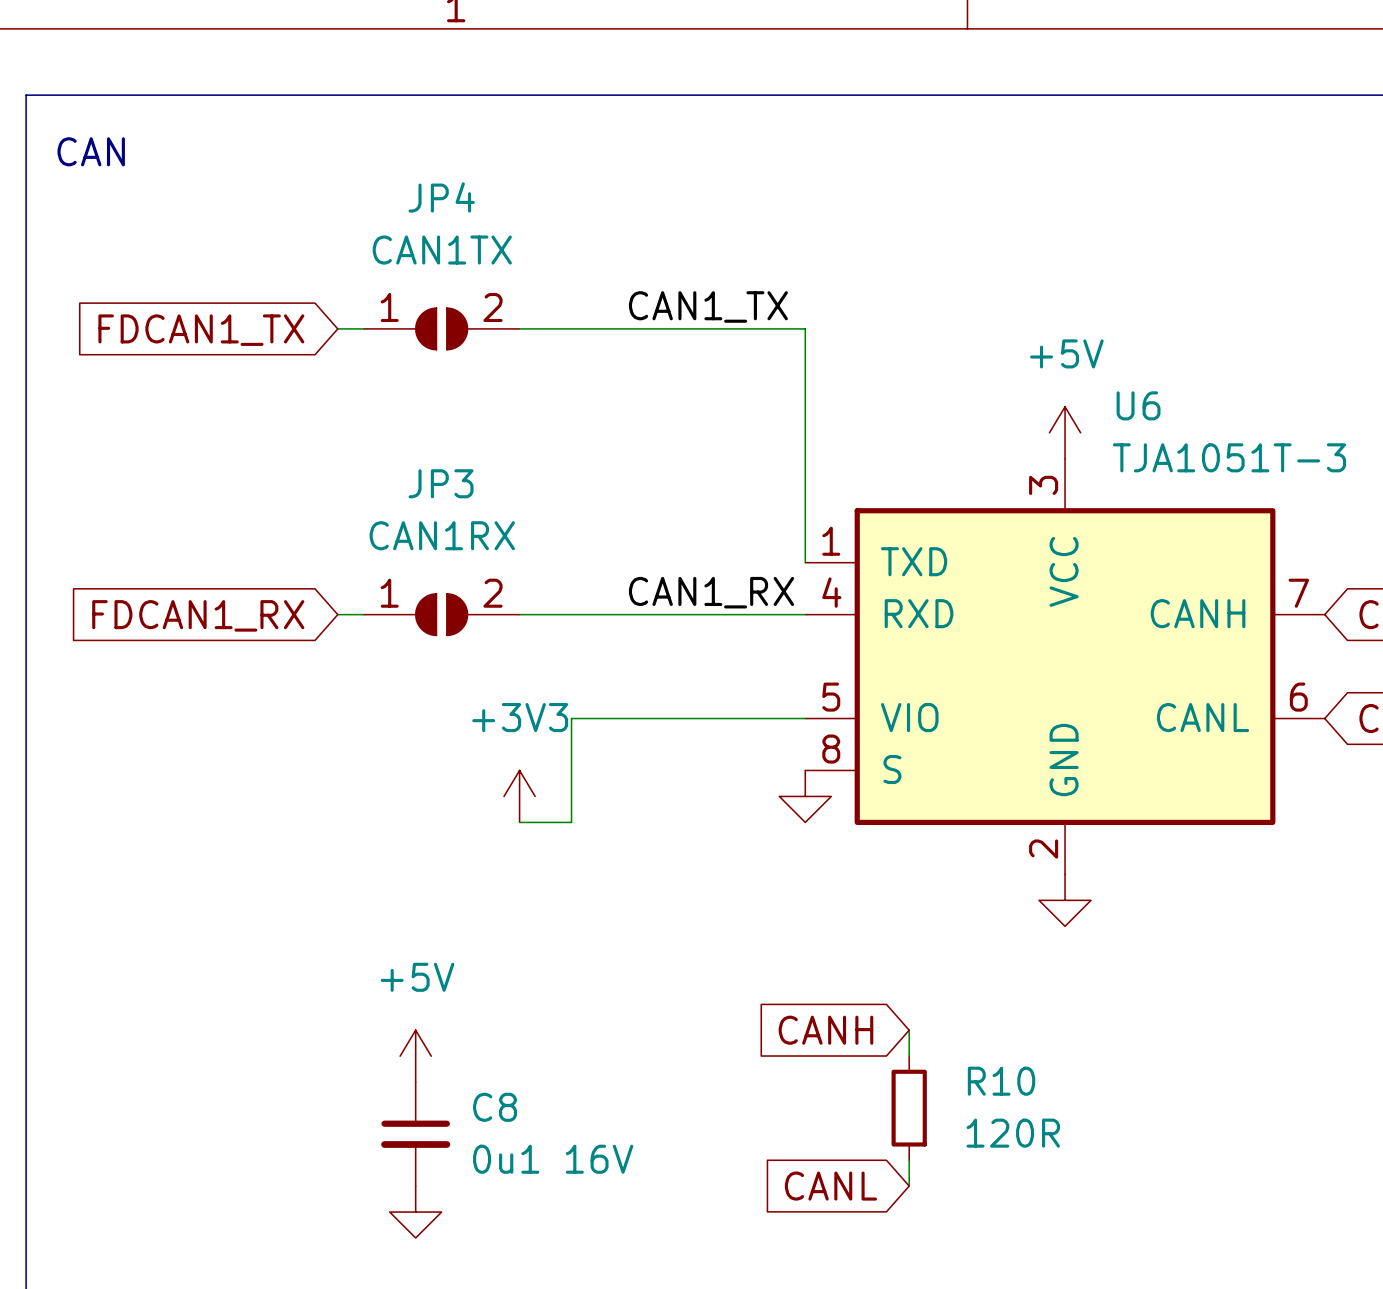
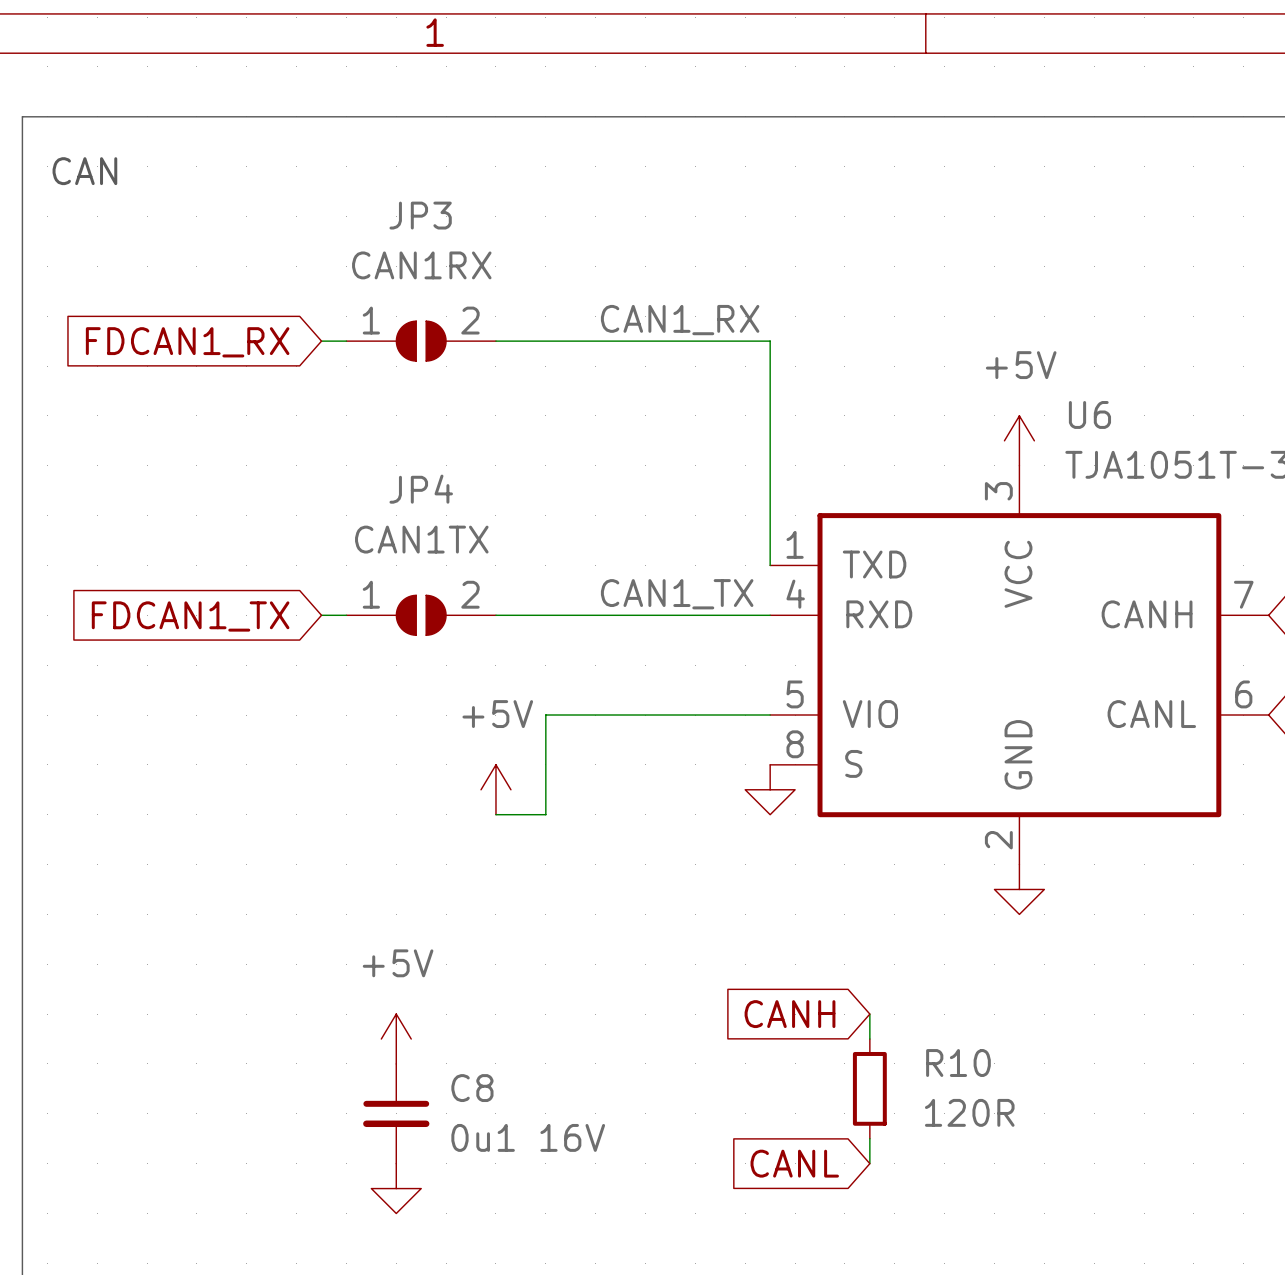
JP4 name: JP4 (441, 197) -> JP3 (420, 215)
JP4 value: CAN1TX (442, 250) -> CAN1RX (421, 265)
label: CAN1_TX (708, 306) -> CAN1_RX (680, 320)
global label: FDCAN1_TX (201, 330) -> FDCAN1_RX (187, 342)
JP3 name: JP3 (441, 483) -> JP4 (421, 489)
JP3 value: CAN1RX (442, 535) -> CAN1TX (421, 539)
label: CAN1_RX (711, 592) -> CAN1_TX (677, 594)
global label: FDCAN1_RX (198, 615) -> FDCAN1_TX (190, 616)
power symbol: +3V3 (519, 796) -> +5V (495, 789)

